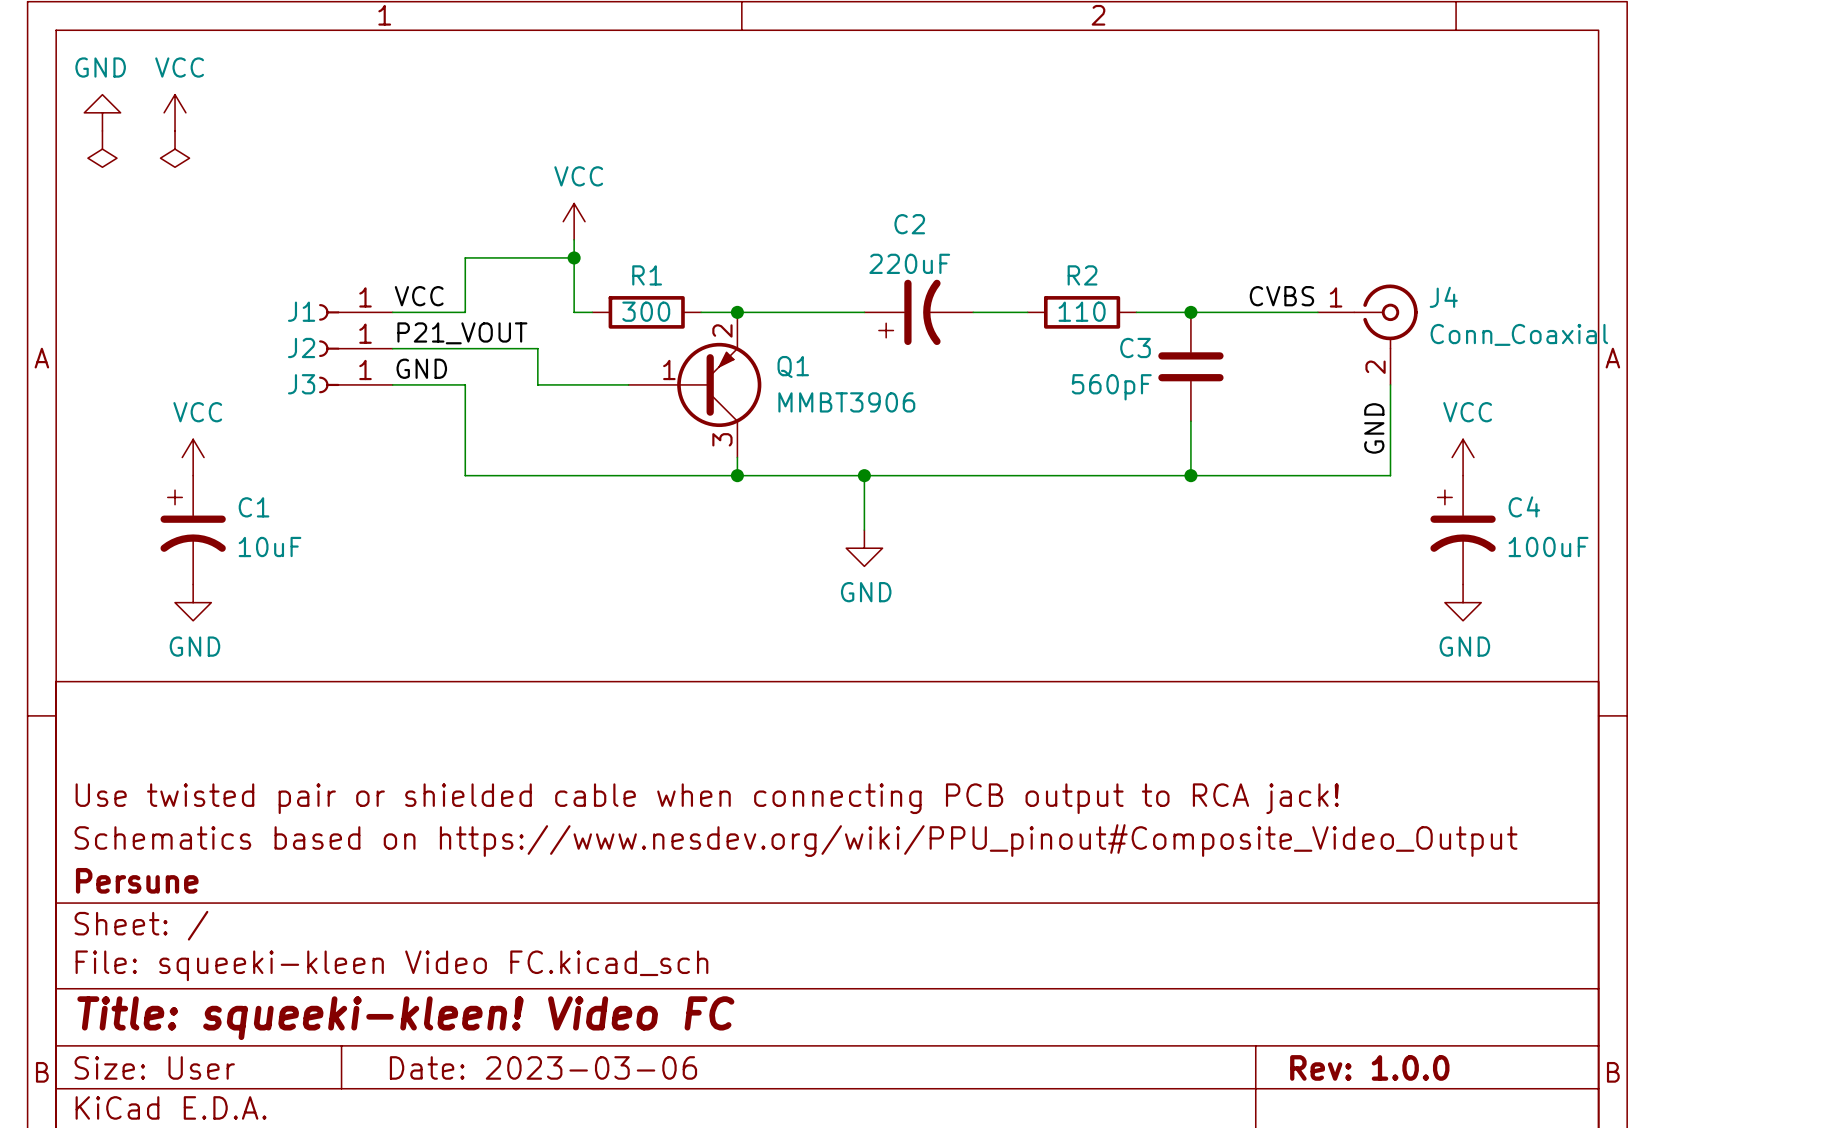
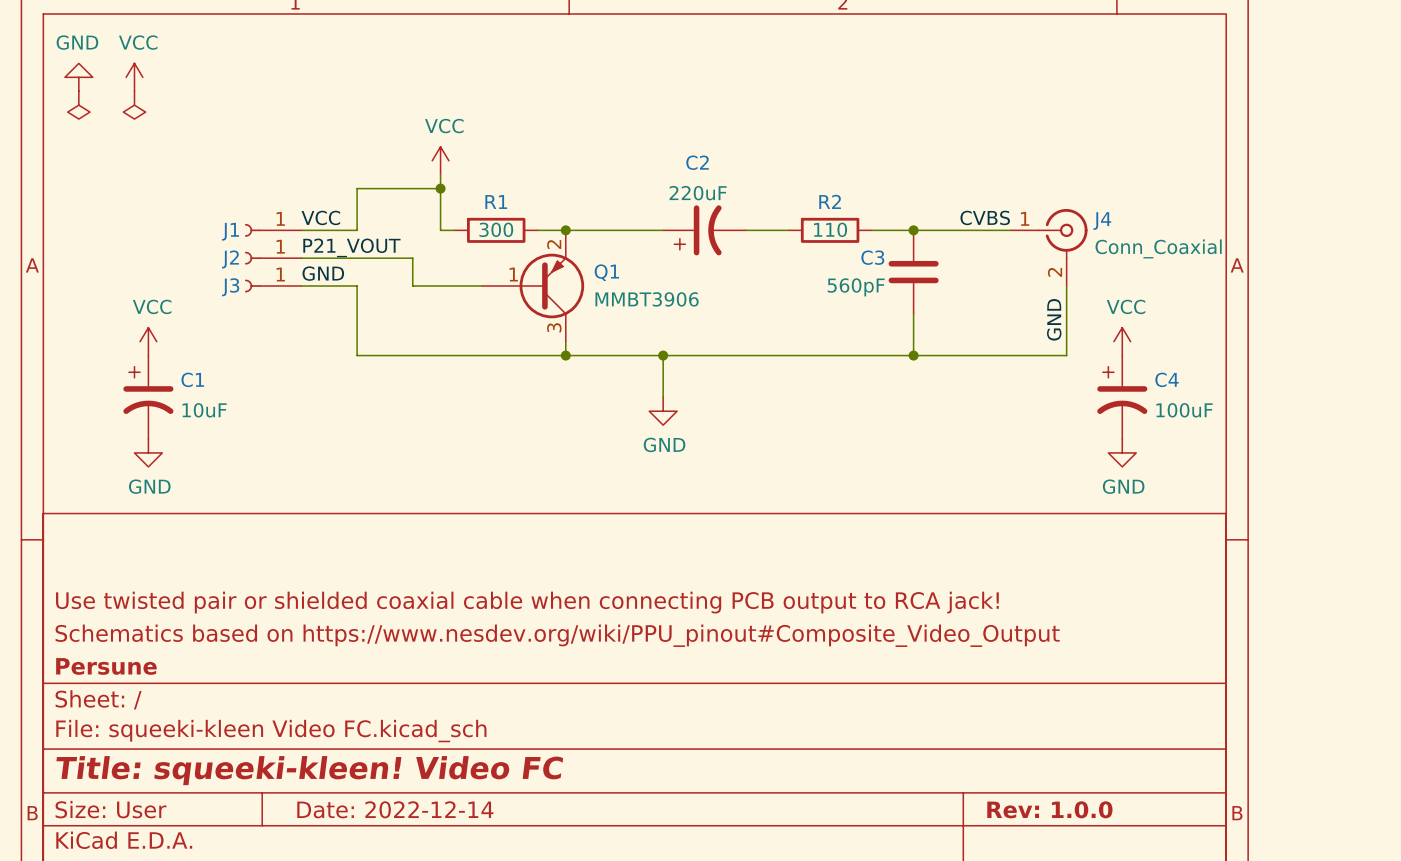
title block: Use twisted pair or shielded cable when connecting PCB output to RCA jack! (707, 798) -> Use twisted pair or shielded coaxial cable when connecting PCB output to RCA jack! (527, 602)
title block: Date: 2023-03-06 (543, 1067) -> Date: 2022-12-14 (395, 809)

